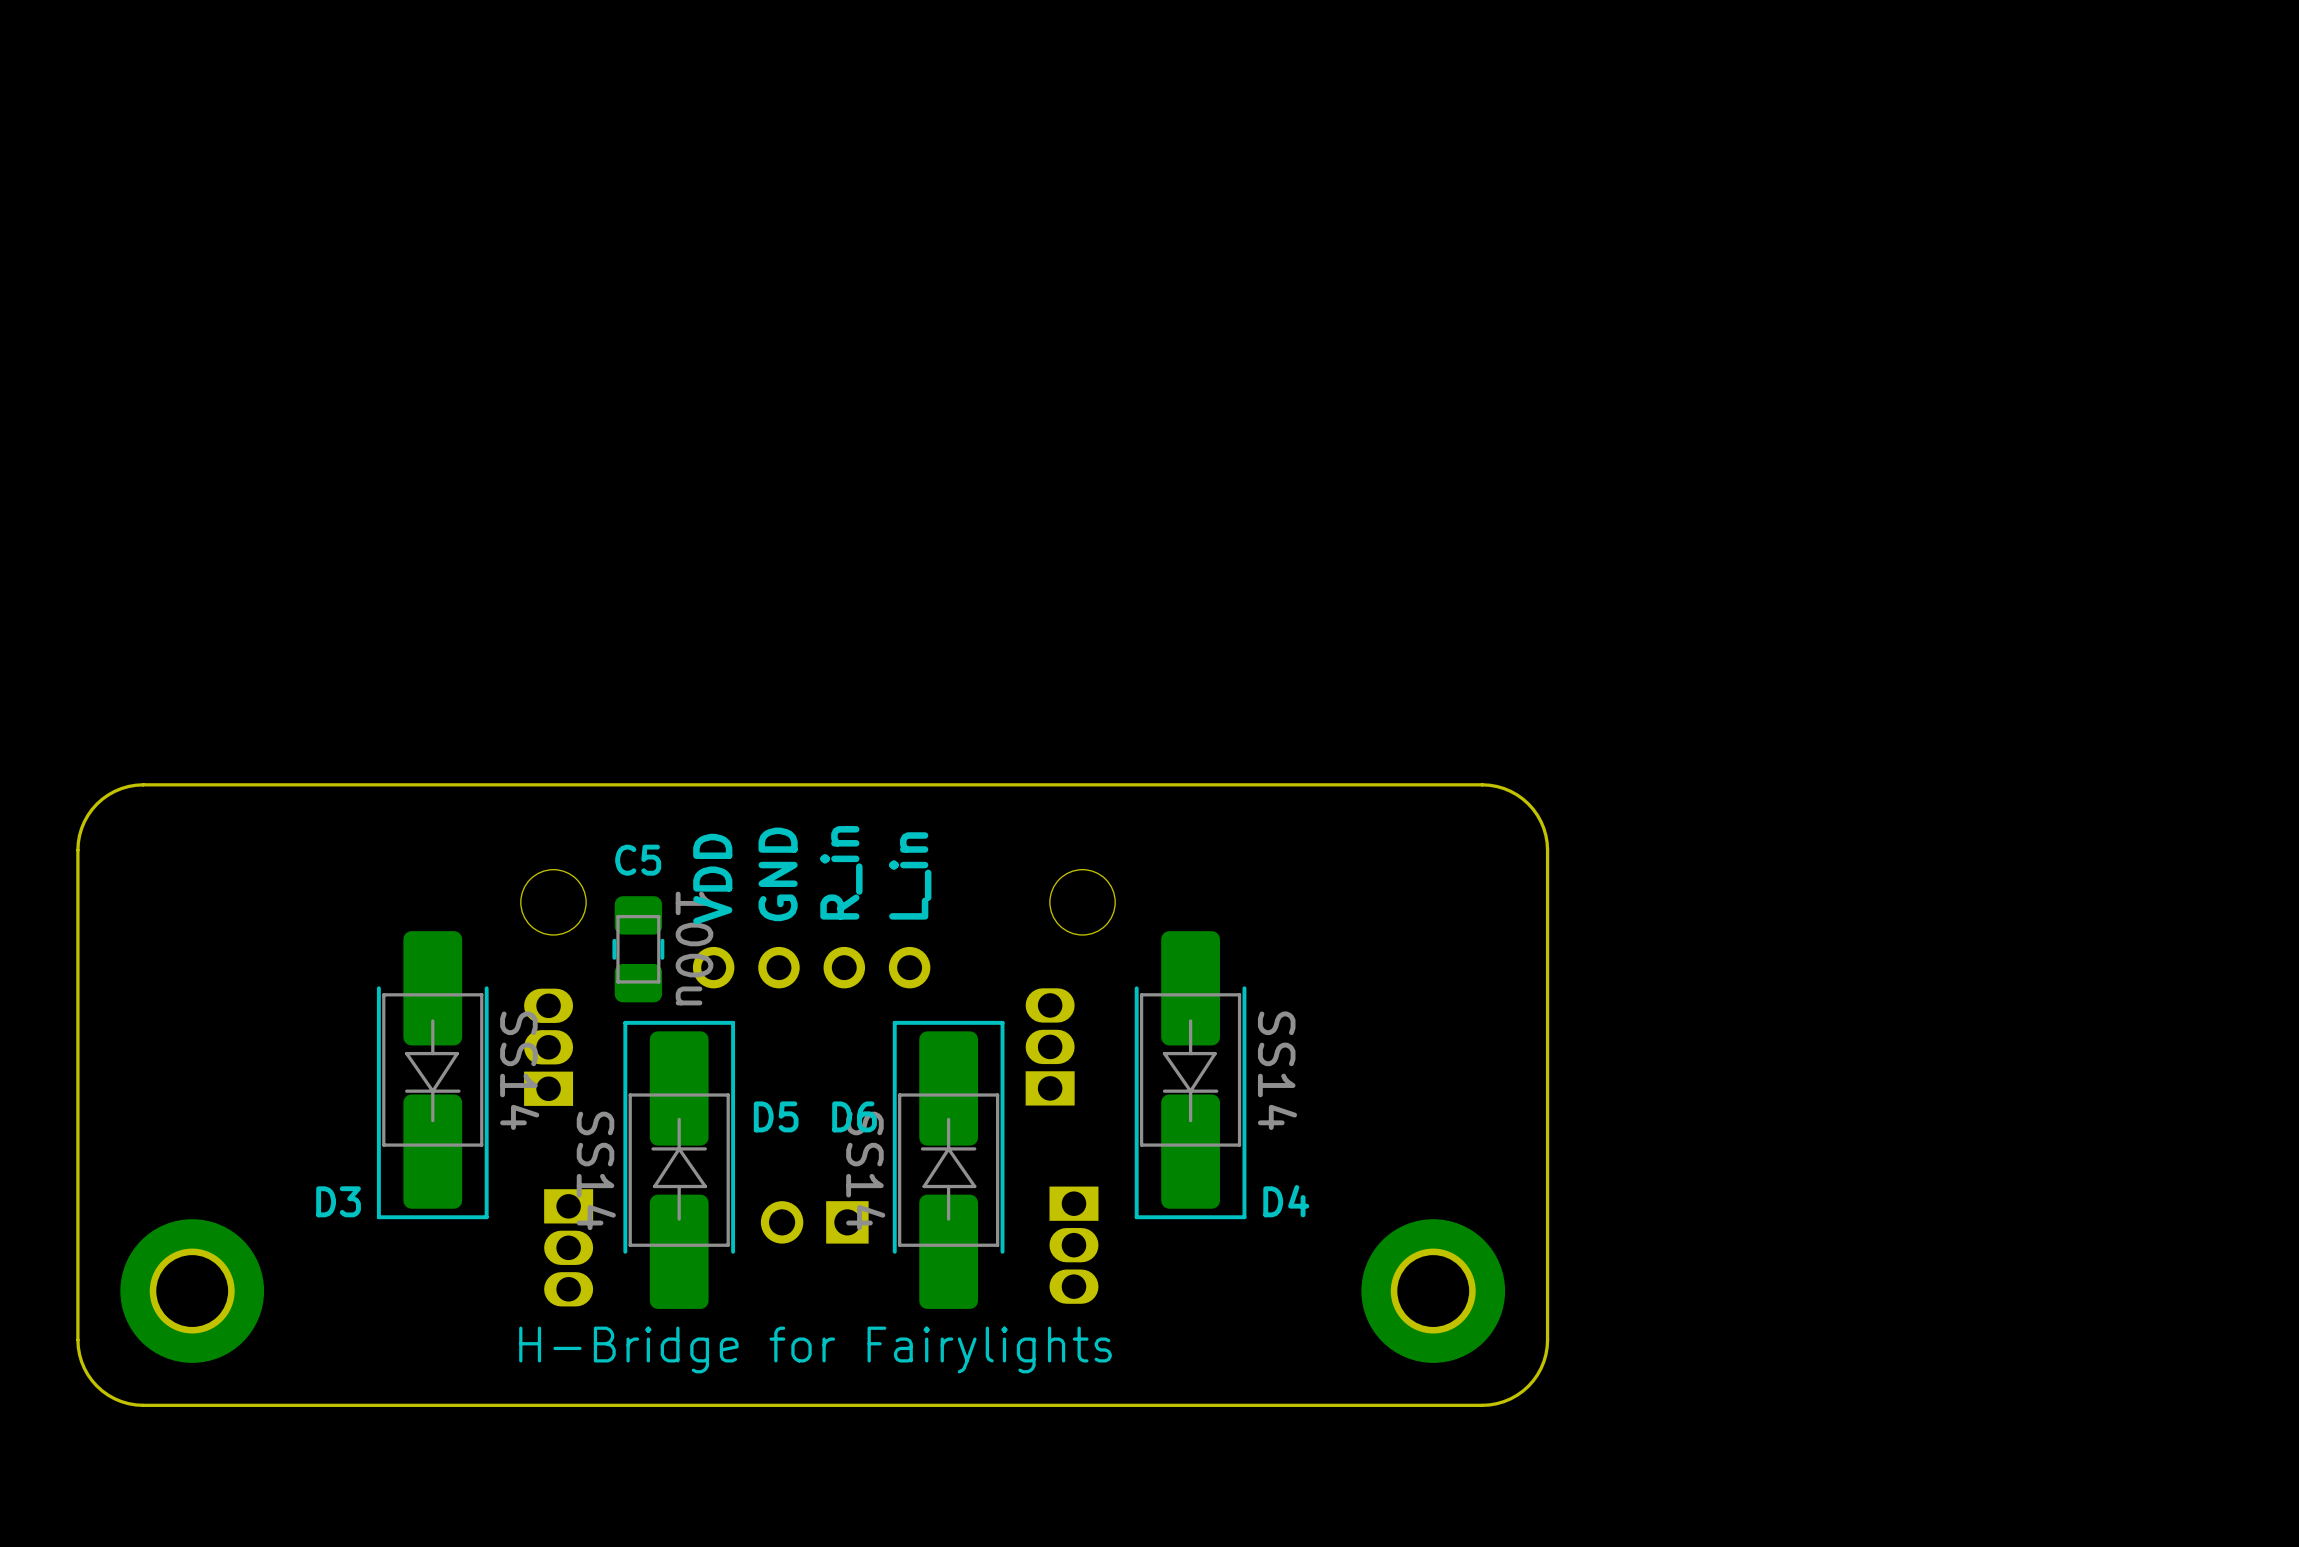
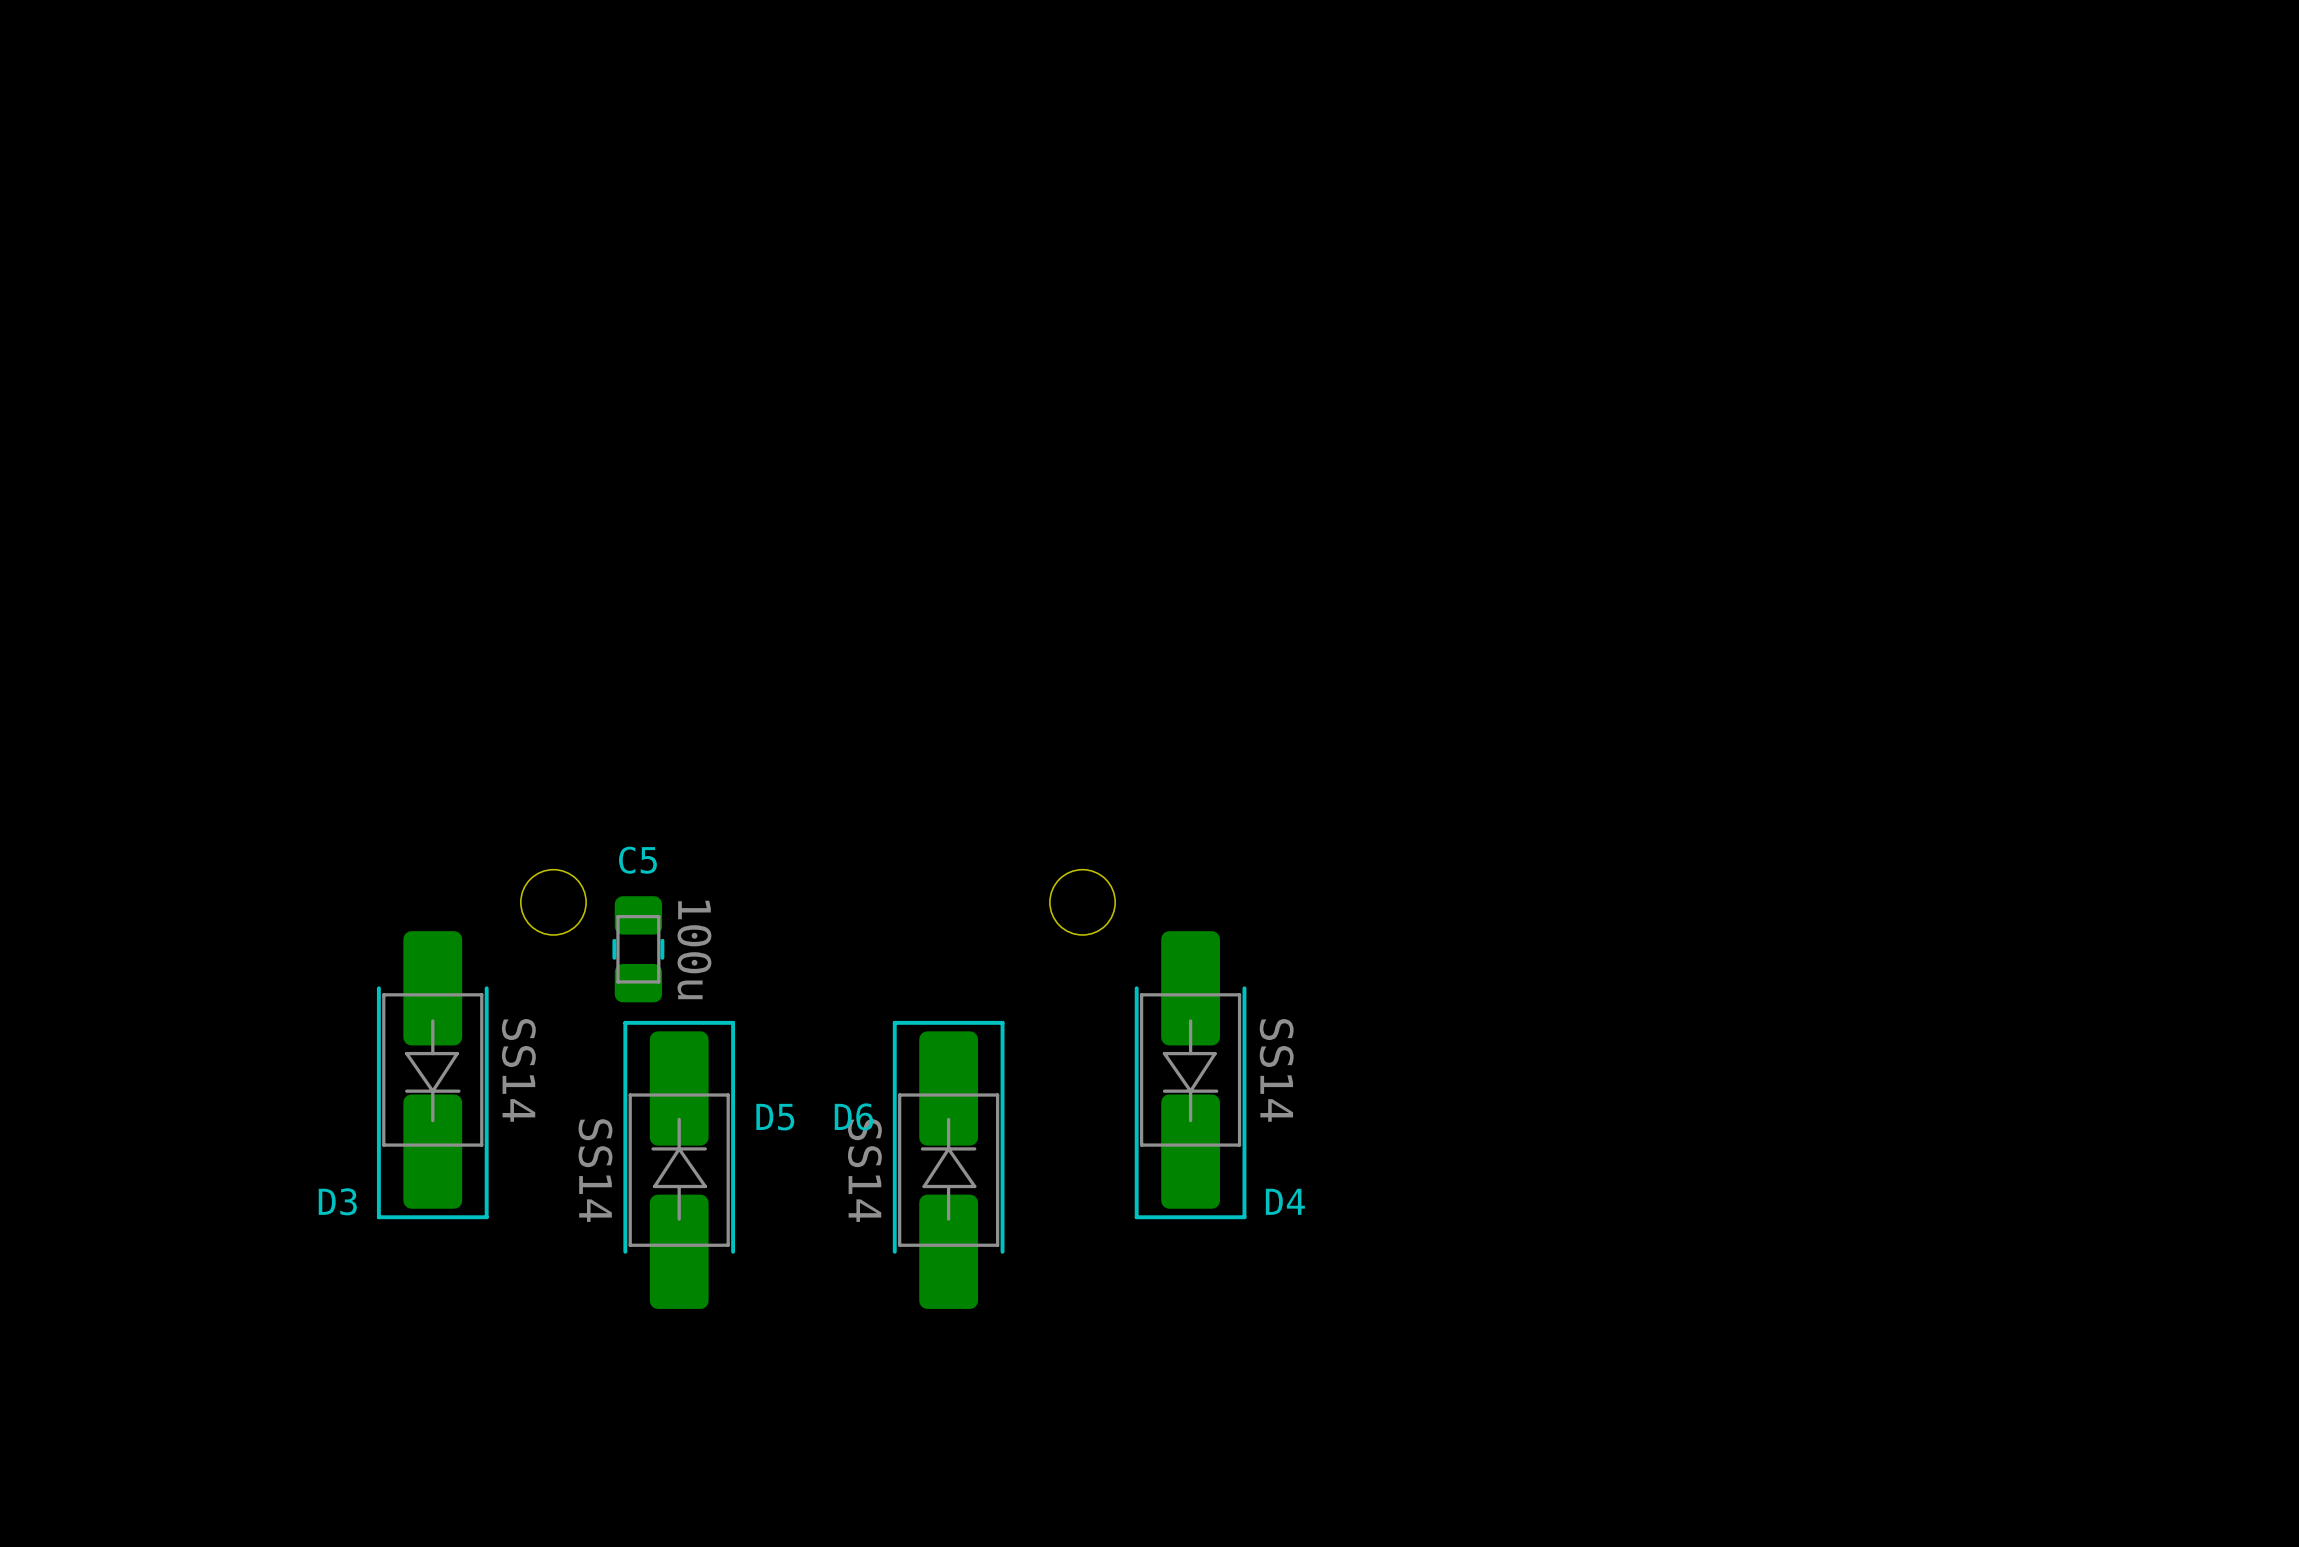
board edge: (1482, 784) (143, 784) (128, 786) (114, 791) (102, 799) (87, 815) (81, 828) (77, 850) (77, 1340) (79, 1354) (84, 1368) (92, 1380) (108, 1395) (121, 1401) (143, 1405) (1482, 1405) (1496, 1403) (1510, 1398) (1522, 1391) (1533, 1380) (1543, 1361) (1547, 1347) (1547, 850) (1543, 828) (1537, 815) (1528, 803) (1516, 794) (1503, 788) (1482, 784) -> none
text: R_in (841, 872) -> none
text: GND (778, 874) -> none
text: L_in (910, 875) -> none
text: VDD (712, 879) -> none
part: (811, 967) -> none
part: (1050, 1046) -> none
part: (548, 1047) -> none
part: (814, 1222) -> none
part: (1073, 1245) -> none
part: (568, 1247) -> none
part: (192, 1291) -> none
part: (1433, 1291) -> none
text: H-Bridge for Fairylights (815, 1349) -> none

